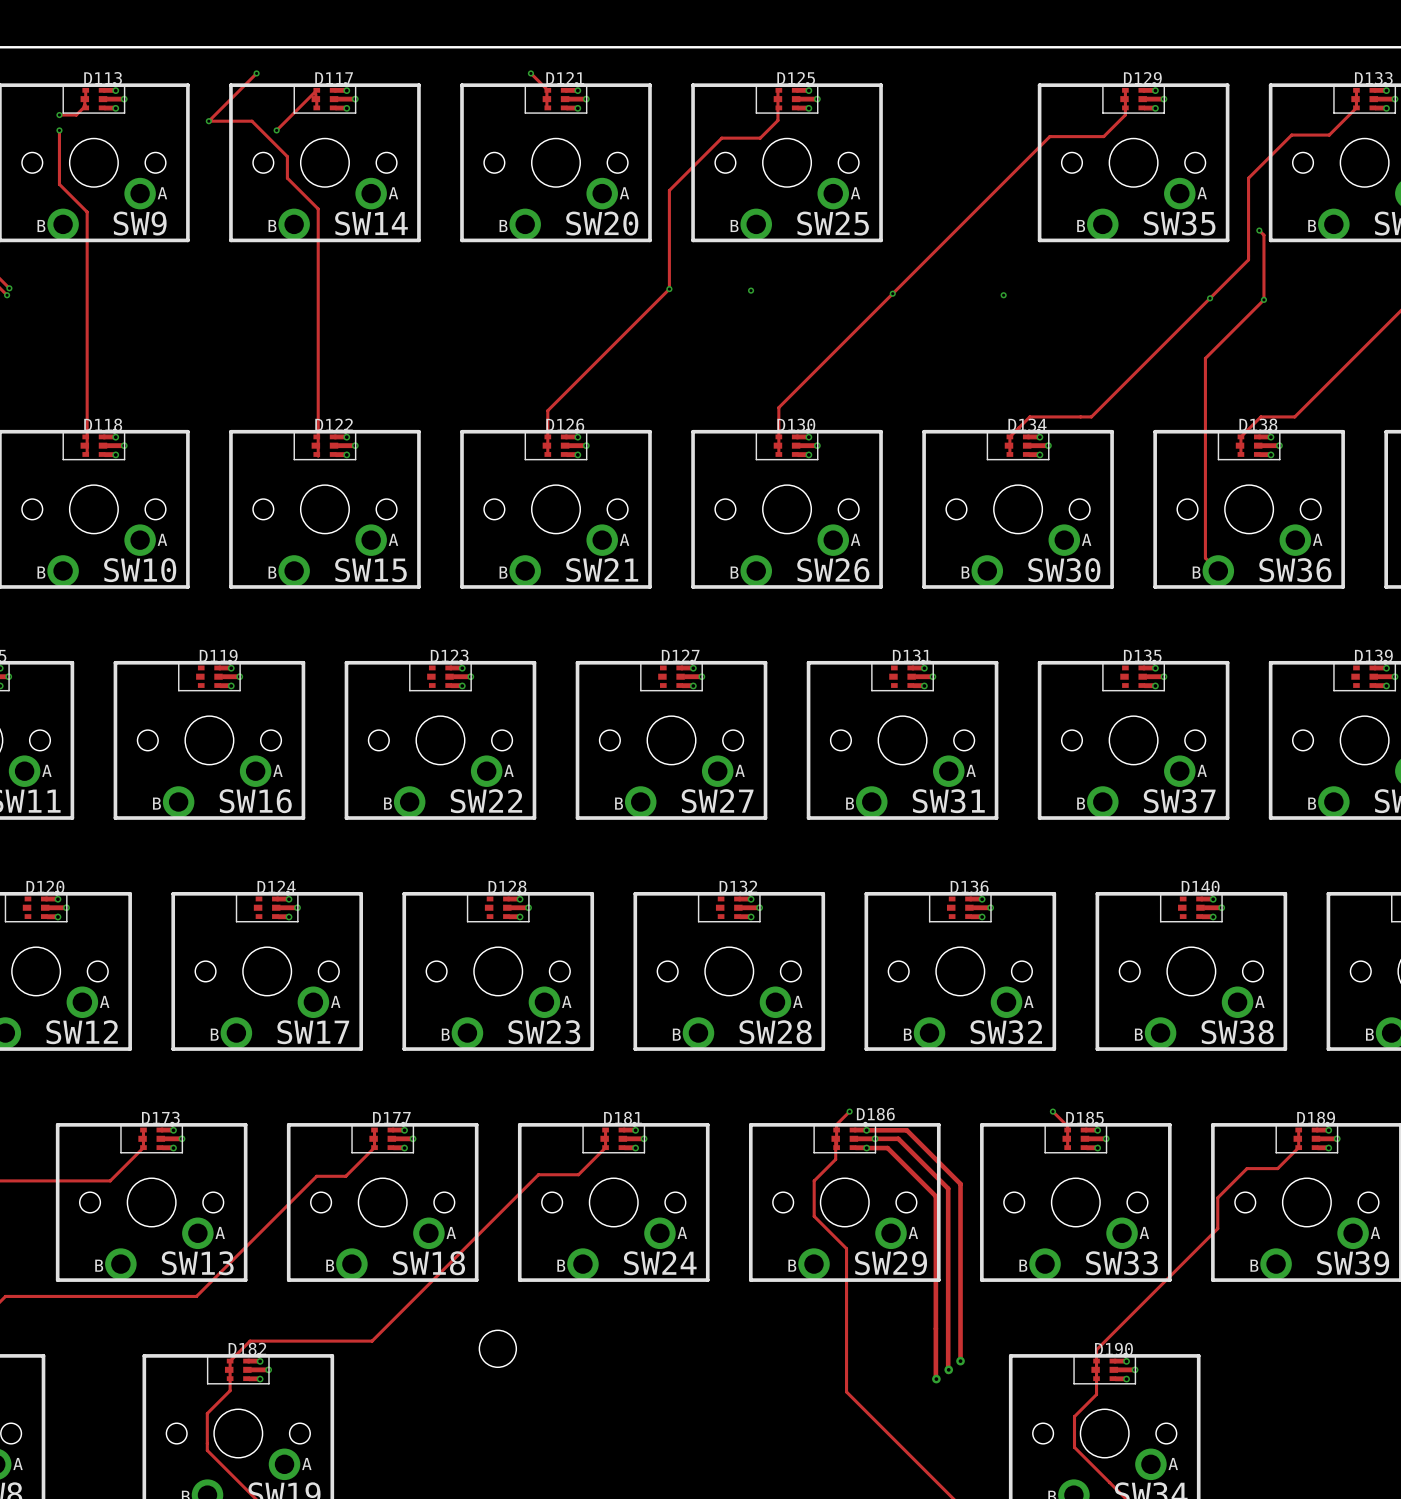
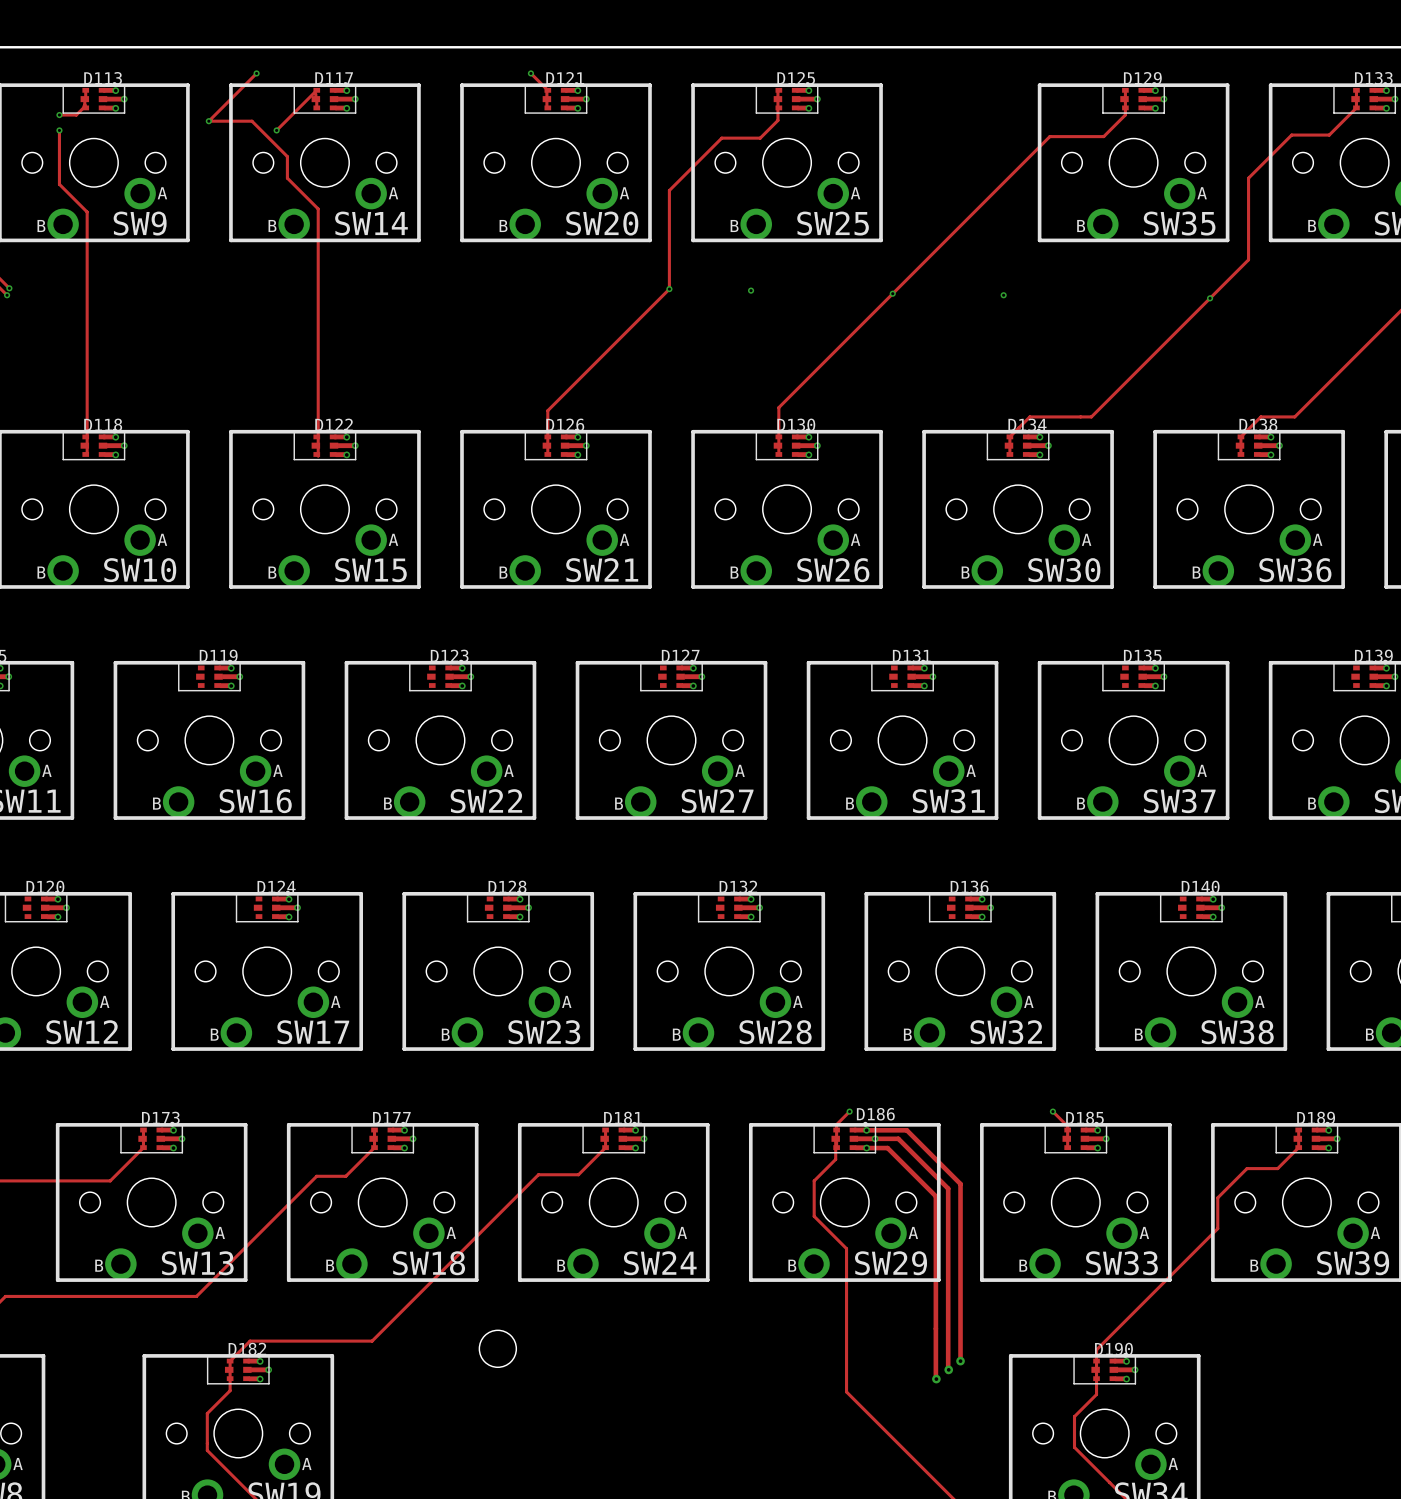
track: (1259, 230) (1263, 235) (1263, 299) (1205, 358) (1205, 558) (1218, 570) -> none
via: (1259, 230) -> none
via: (1263, 299) -> none

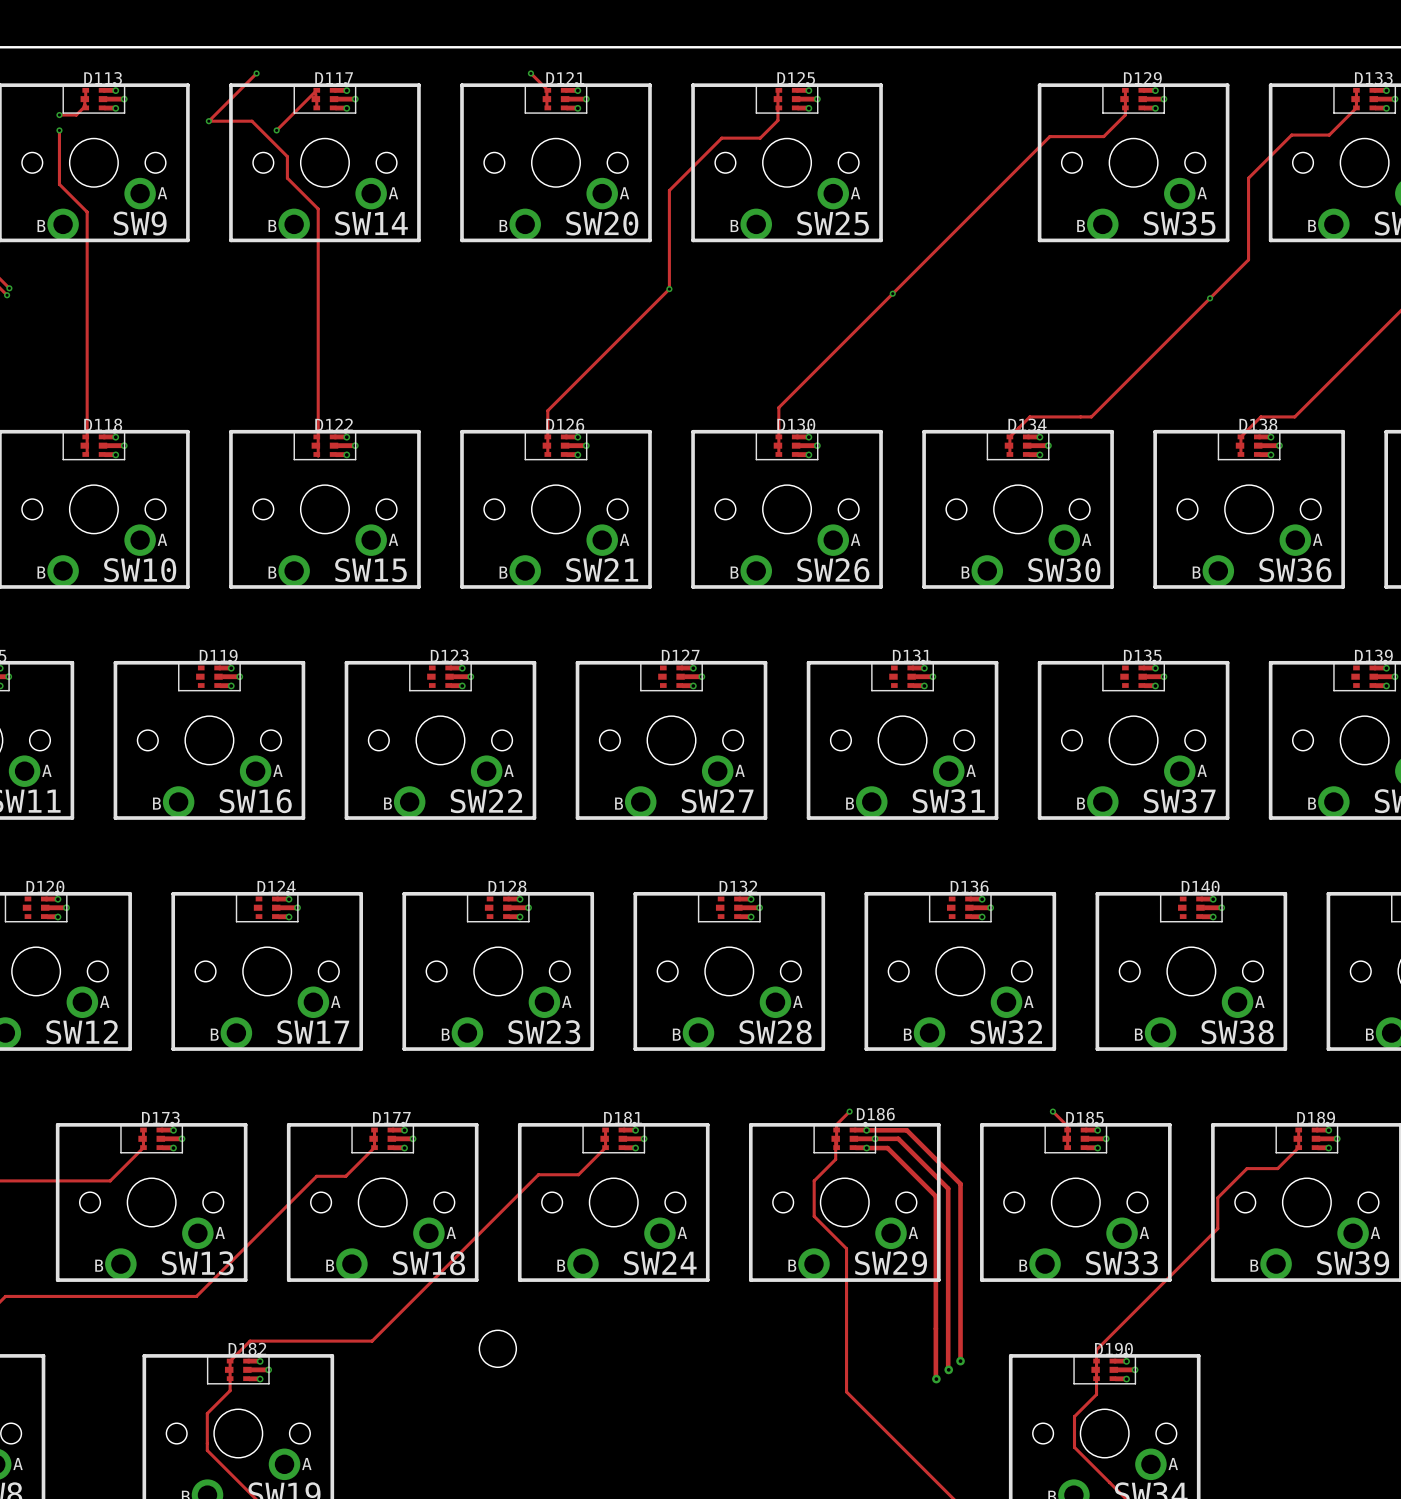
via: (751, 290) -> none
via: (1003, 295) -> none

